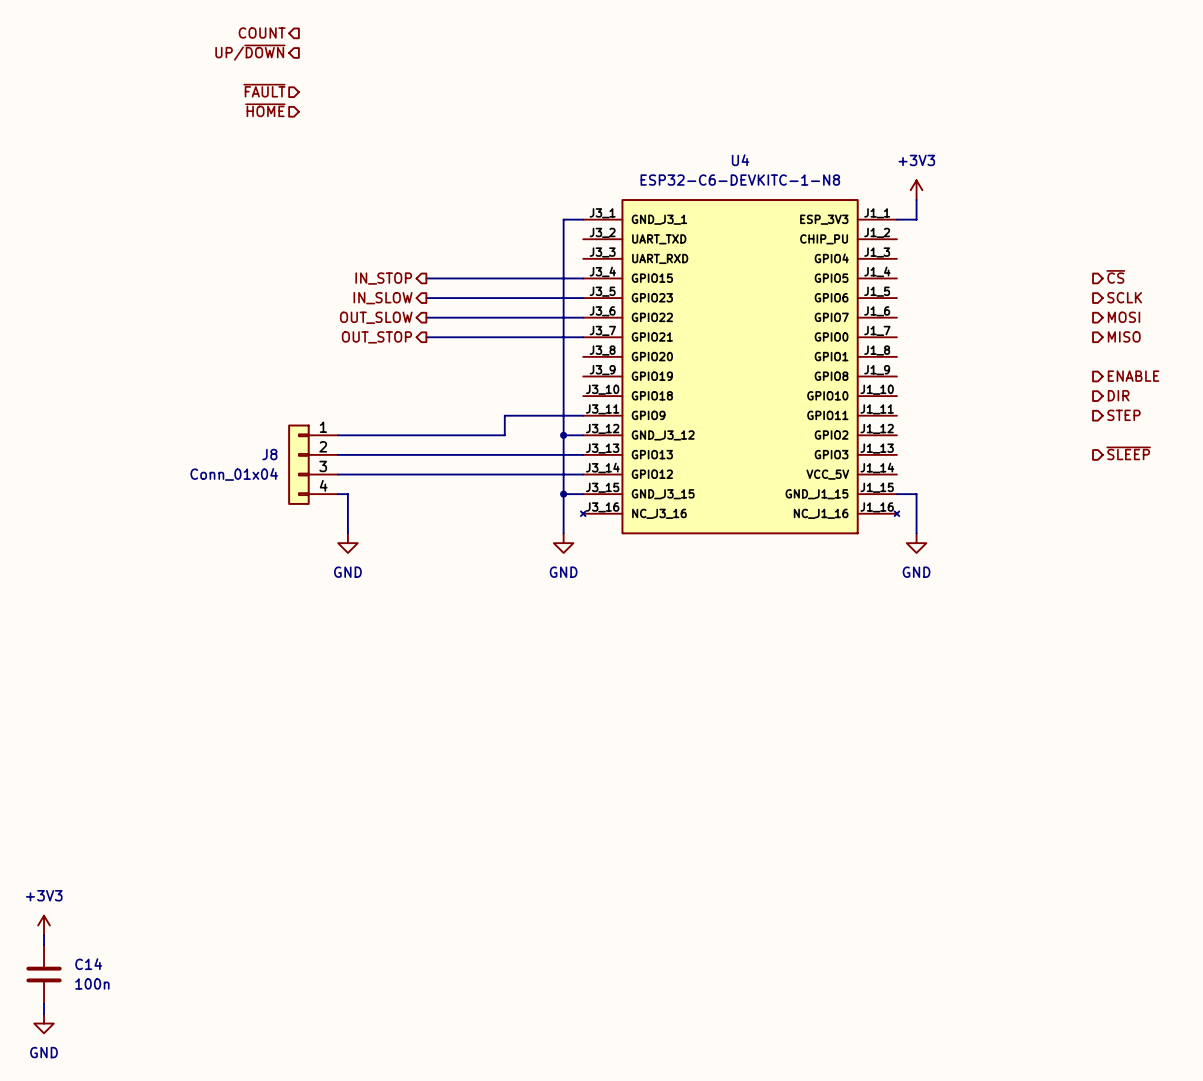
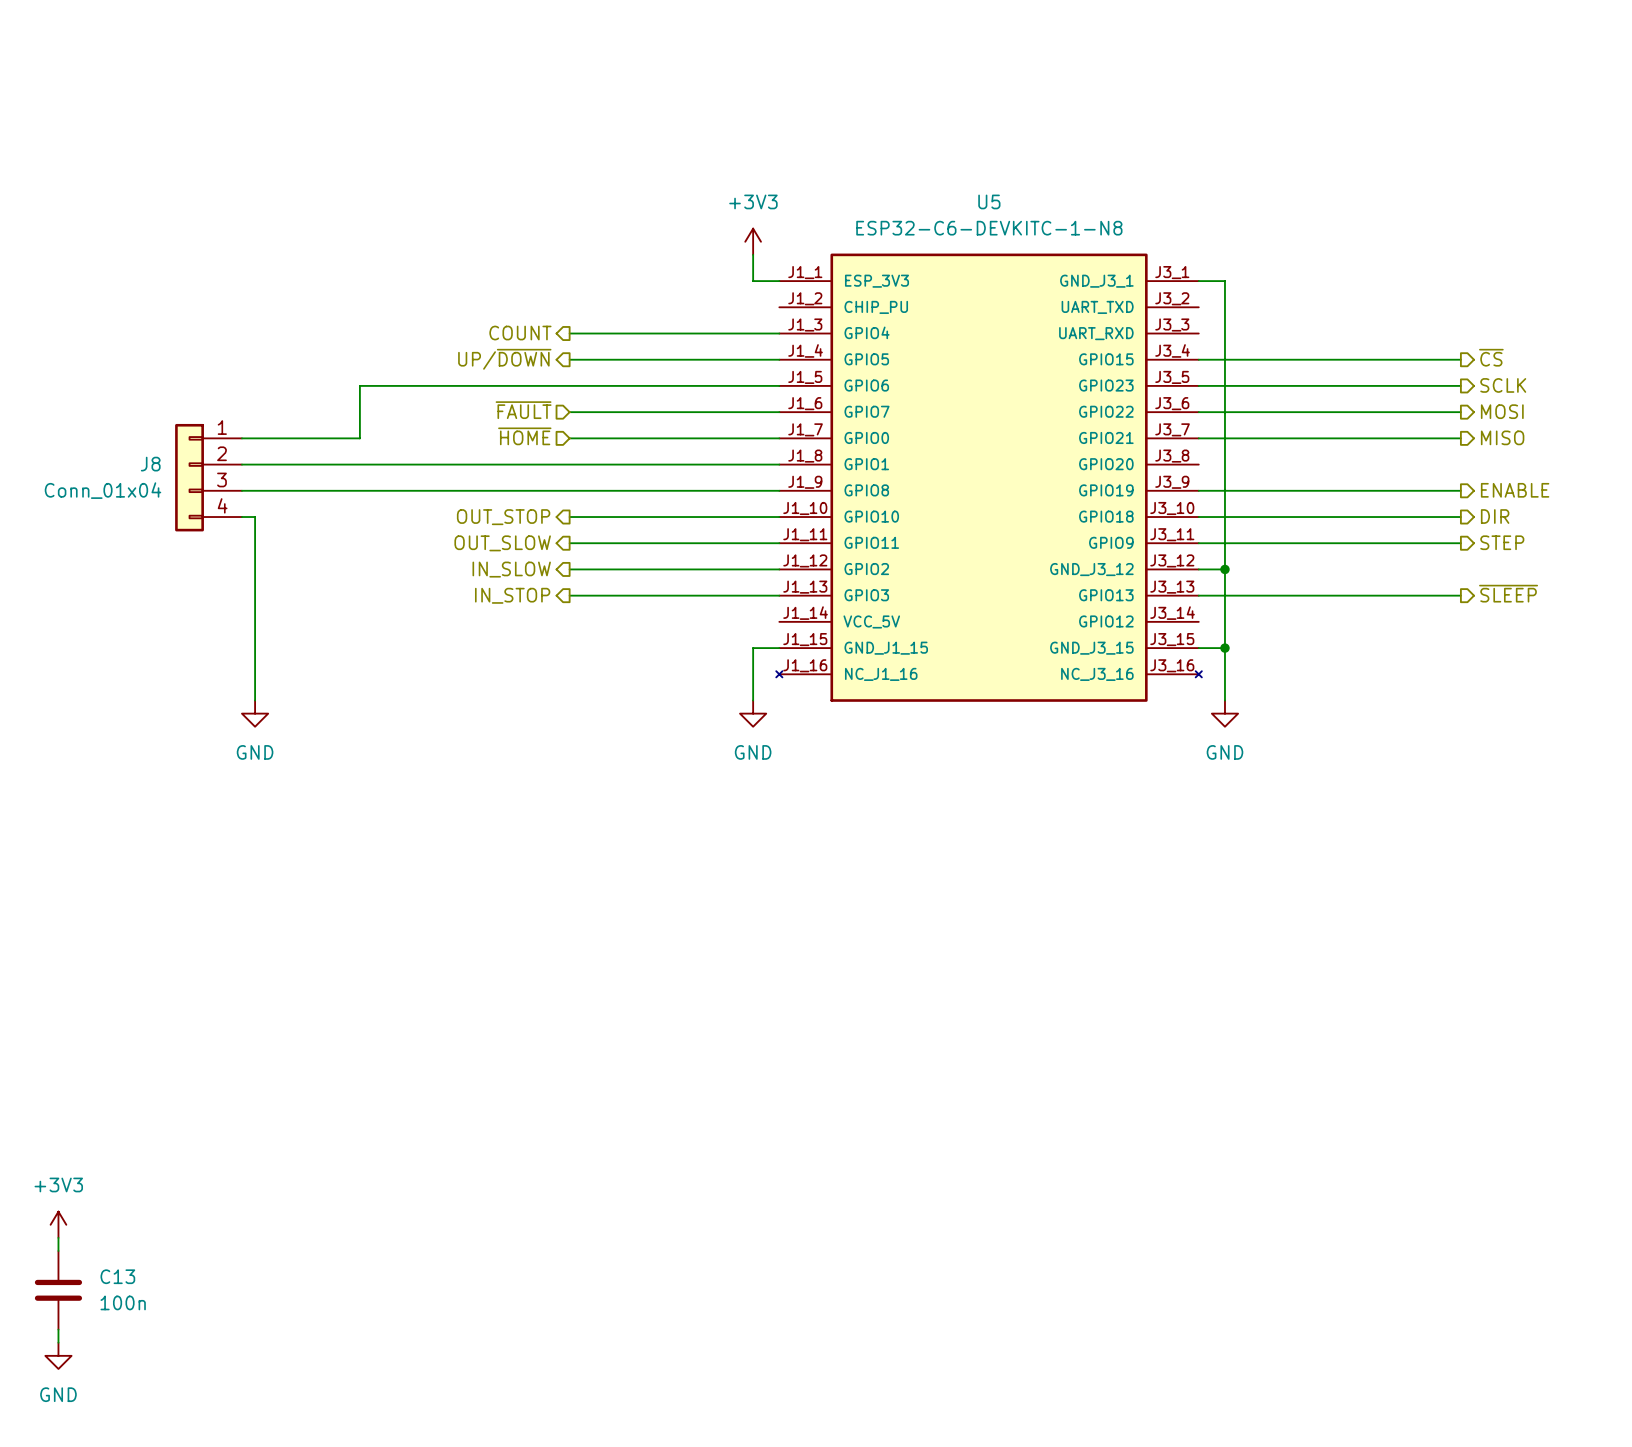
hierarchical label: COUNT (262, 32) -> none
hierarchical label: UP/~{DOWN} (250, 52) -> none
hierarchical label: ~{FAULT} (264, 90) -> none
hierarchical label: ~{HOME} (265, 110) -> none
U4 name: U4 (740, 160) -> U5 (989, 201)
power symbol: none -> +3V3 (753, 241)
power symbol: +3V3 (916, 190) -> none
wire: (916, 200) (916, 219) -> (1224, 648) (1224, 281)
wire: (563, 219) (563, 494) -> (753, 281) (753, 254)
hierarchical label: none -> COUNT (520, 333)
wire: none -> (569, 333) (779, 333)
hierarchical label: IN_STOP (383, 278) -> UP/~{DOWN} (504, 359)
wire: none -> (1198, 359) (1460, 359)
hierarchical label position: IN_SLOW (383, 298) -> IN_SLOW (511, 569)
wire: none -> (569, 385) (359, 385) (359, 438) (241, 438)
wire: none -> (1198, 385) (1460, 385)
hierarchical label shape: output (376, 317) -> input (523, 410)
hierarchical label: OUT_SLOW (376, 317) -> ~{FAULT} (523, 410)
wire: none -> (1198, 412) (1460, 412)
hierarchical label shape: output (376, 337) -> input (524, 436)
hierarchical label: OUT_STOP (376, 337) -> ~{HOME} (524, 436)
wire: none -> (1198, 438) (1460, 438)
wire: none -> (241, 464) (779, 464)
U4 flip: as is (740, 366) -> left-right (989, 477)
wire: none -> (241, 490) (779, 490)
wire: none -> (1198, 490) (1460, 490)
wire: none -> (241, 517) (255, 517) (255, 700)
hierarchical label: none -> OUT_STOP (503, 517)
wire: none -> (569, 517) (779, 517)
wire: none -> (1198, 517) (1460, 517)
hierarchical label: none -> OUT_SLOW (502, 543)
wire: none -> (569, 543) (674, 543)
wire: (504, 415) (504, 435) -> (753, 569) (674, 569)
wire: none -> (1198, 543) (1460, 543)
wire: (338, 435) (426, 435) -> none
junction: (563, 435) -> none
wire: none -> (1198, 569) (1224, 569)
junction: none -> (1224, 569)
wire: (338, 454) (426, 454) -> none
wire: none -> (1198, 595) (1460, 595)
hierarchical label: none -> IN_STOP (512, 595)
J8 position: (313, 464) -> (208, 477)
wire: (338, 474) (583, 474) -> none
wire: (338, 494) (347, 494) (347, 533) -> none
junction: (563, 494) -> none
junction: none -> (1224, 648)
power symbol position: GND (347, 543) -> GND (255, 713)
C14 name: C14 (88, 964) -> C13 (117, 1276)

